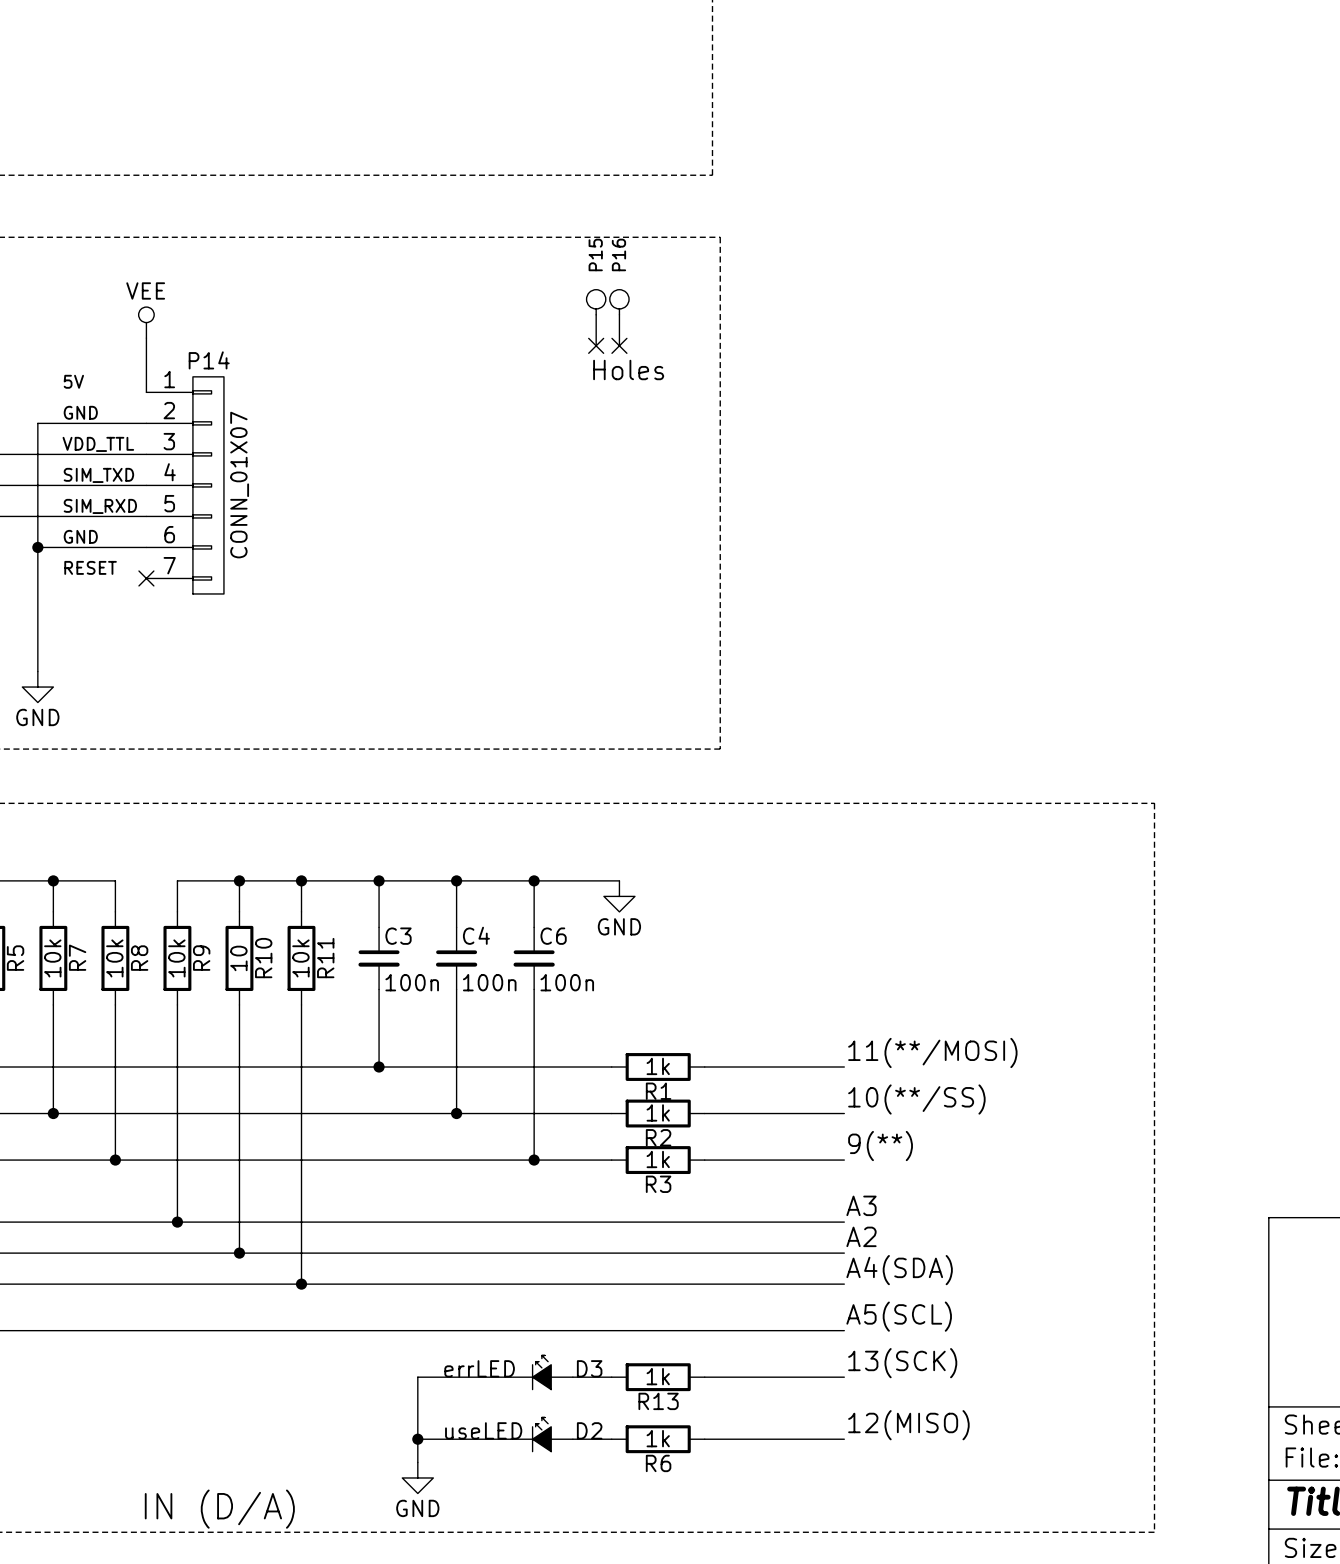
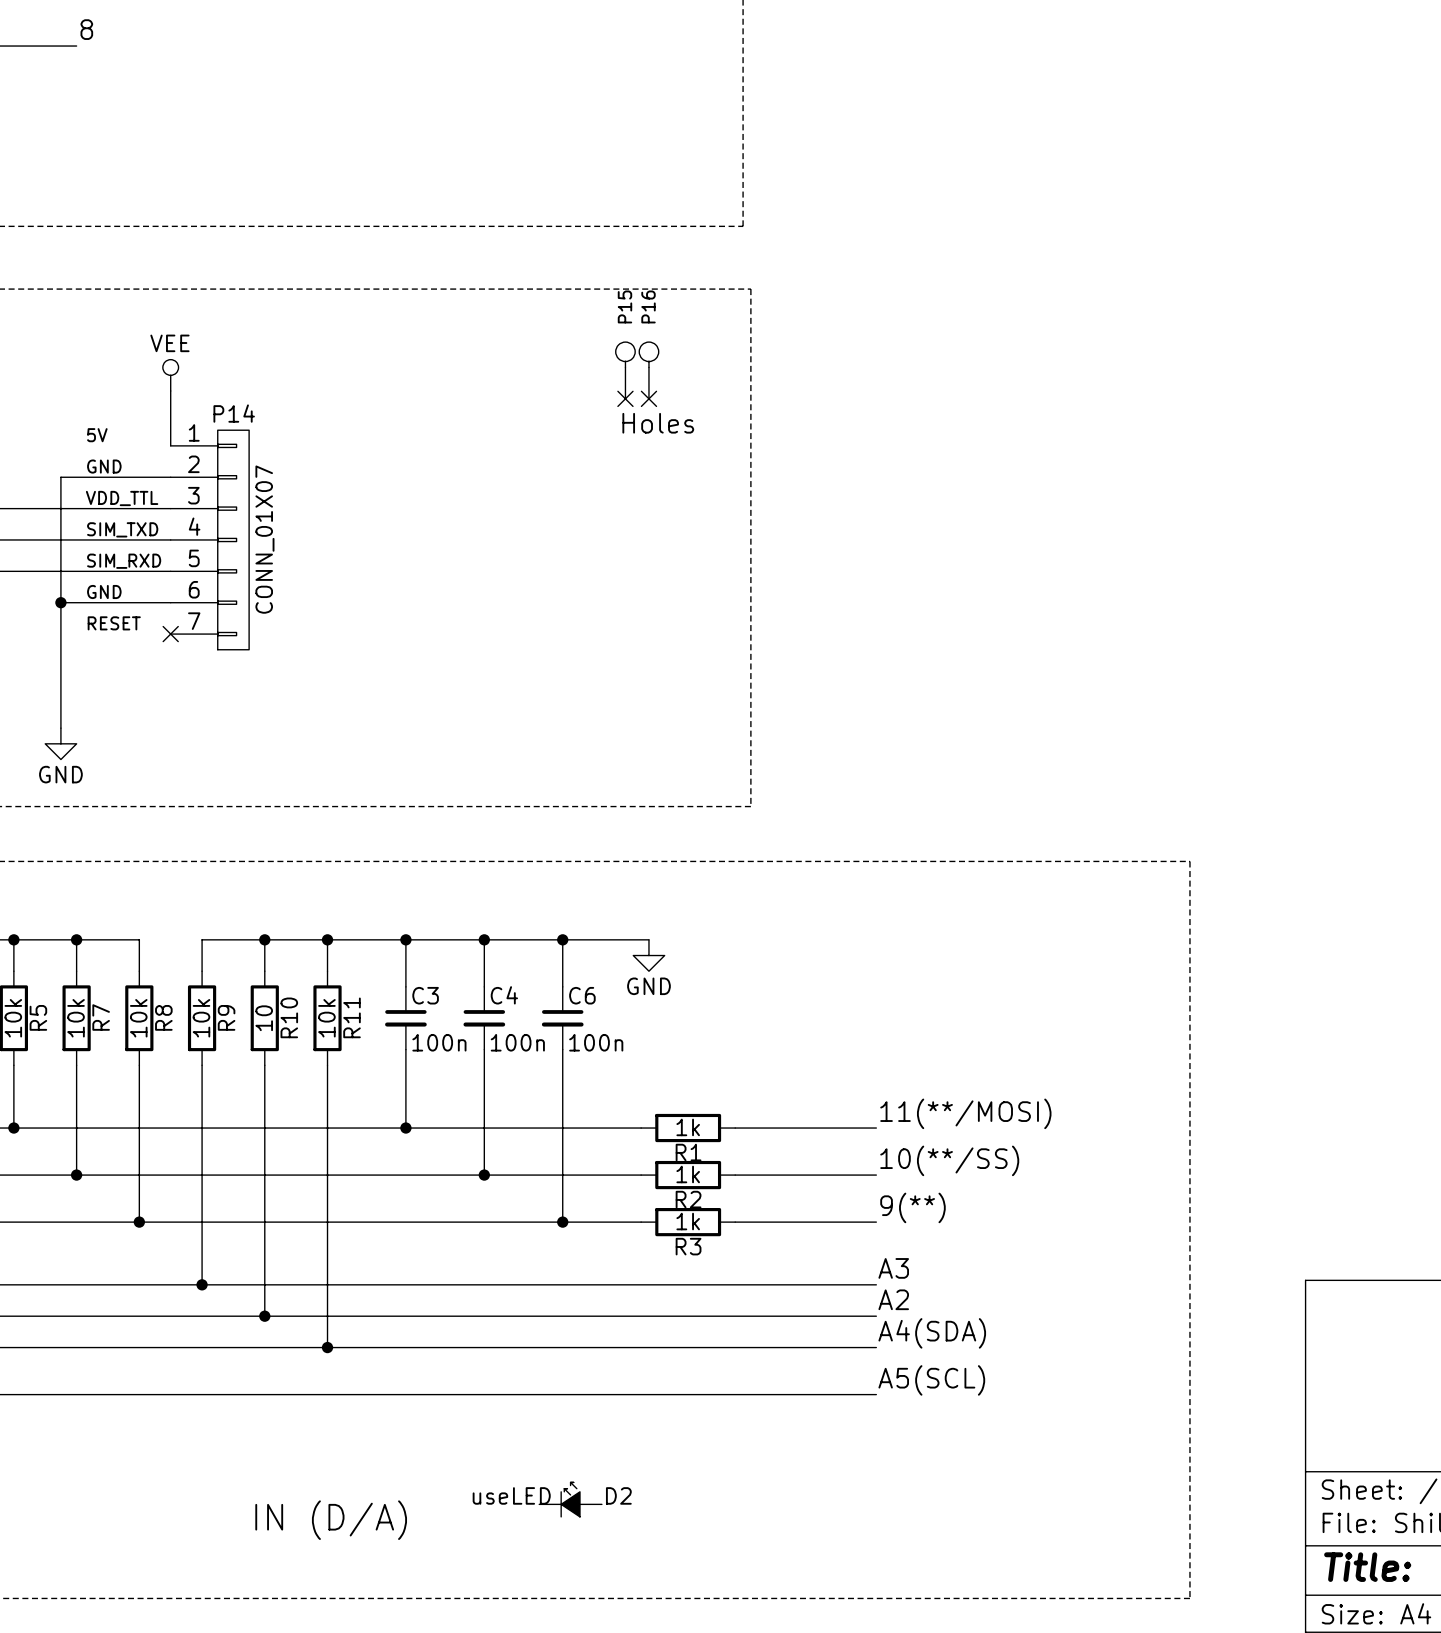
label: 13(SCK) (902, 1363) -> none
D3: errLED (541, 1372) -> none
wire: (510, 1377) (417, 1377) (417, 1462) -> none
wire: (572, 1377) (611, 1377) -> none
R13: 1k (658, 1377) -> none
wire: (704, 1377) (844, 1377) -> none
label: 12(MISO) (908, 1425) -> none
wire: (417, 1439) (510, 1439) -> none
junction: (417, 1439) -> none
wire: (572, 1439) (611, 1439) -> none
R6: 1k (658, 1439) -> none
wire: (704, 1439) (844, 1439) -> none
power symbol: GND (417, 1477) -> none
text position: IN (D/A) (219, 1509) -> IN (D/A) (331, 1520)

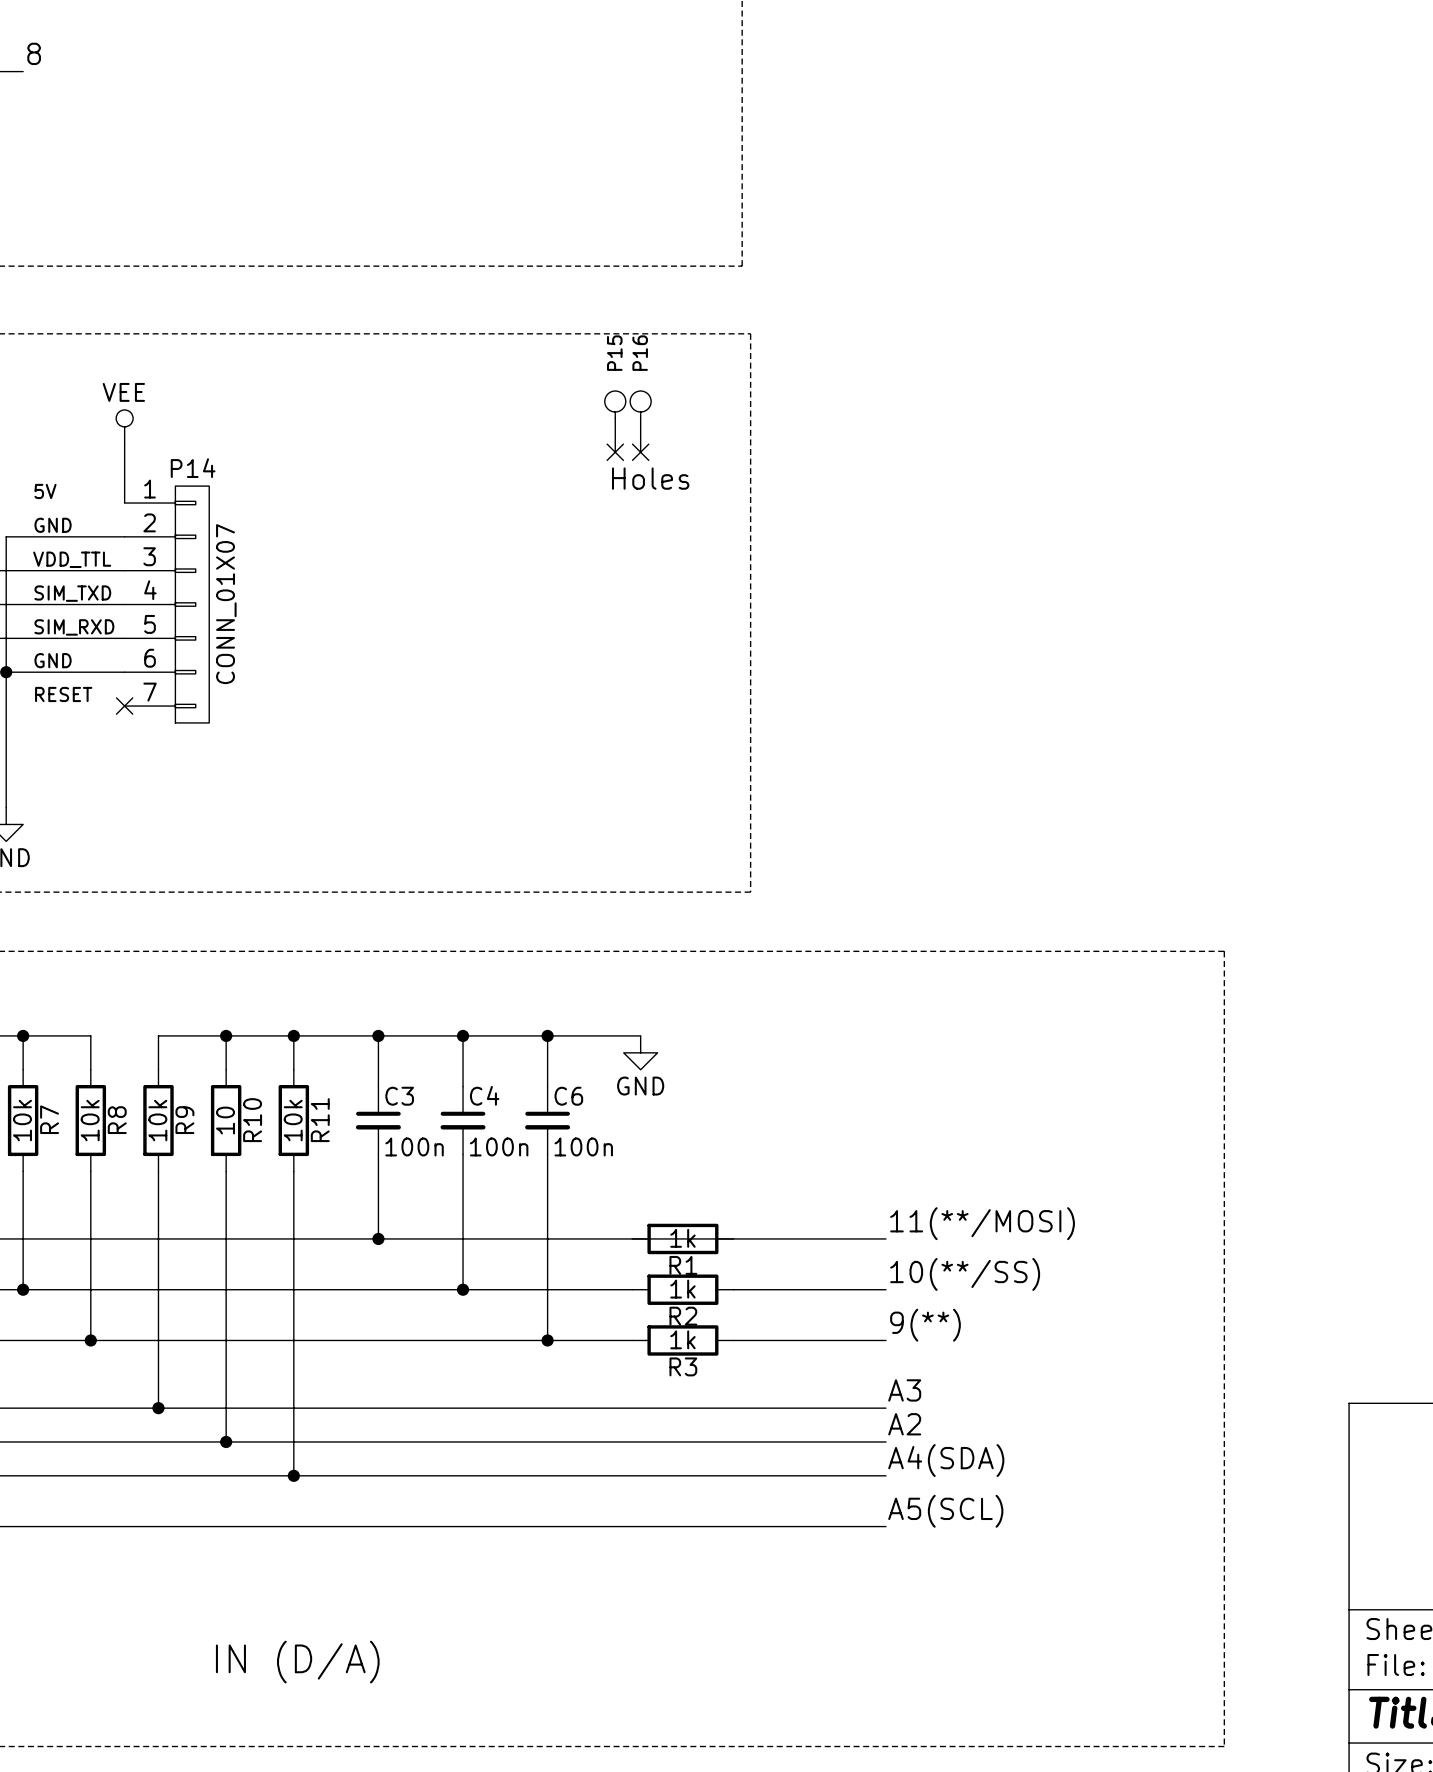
wire: none -> (632, 1238) (733, 1238)
D2: useLED (570, 1499) -> none

